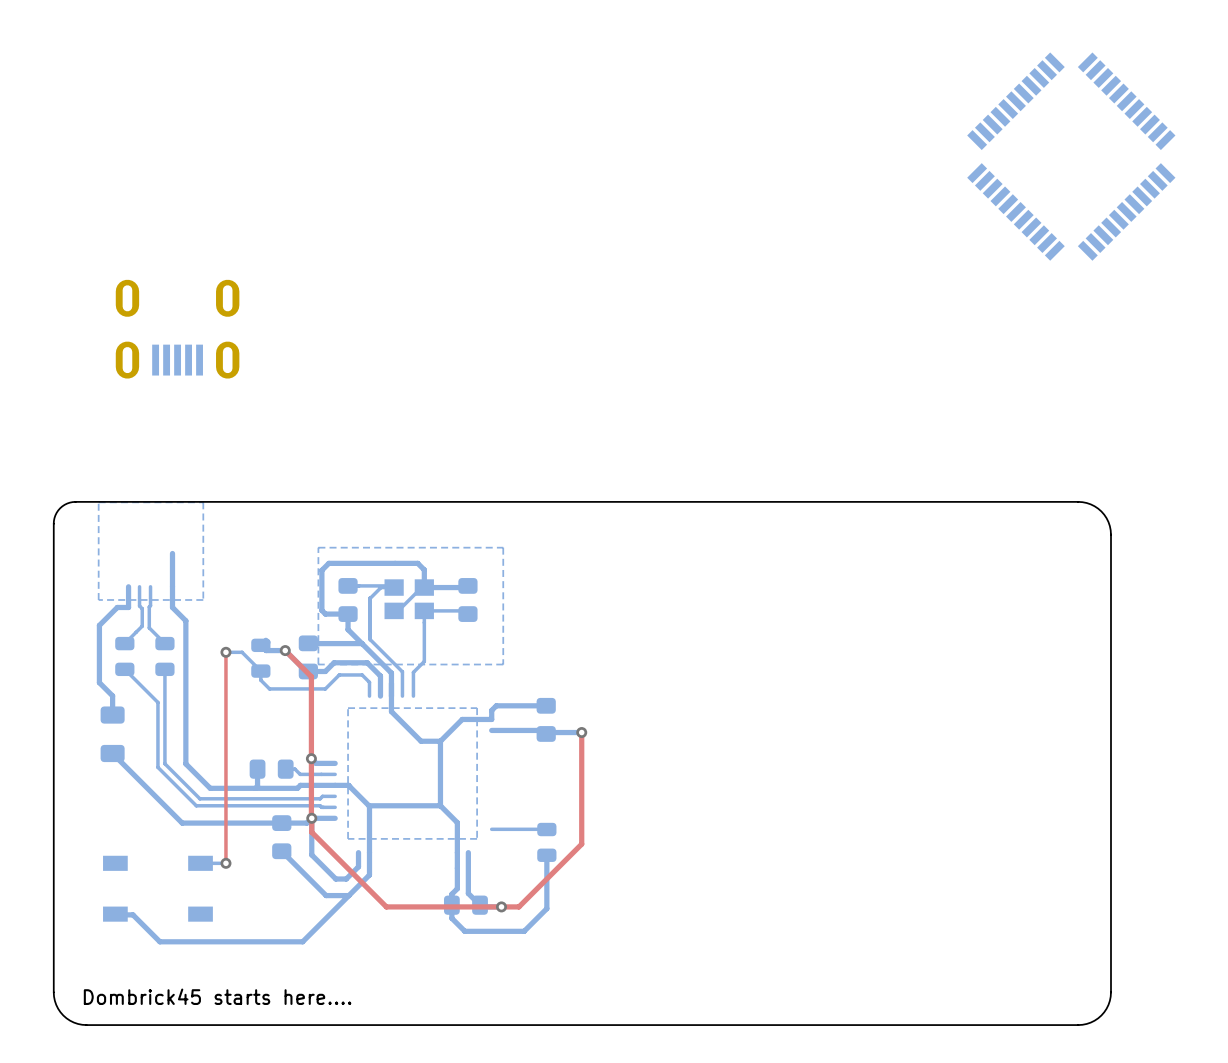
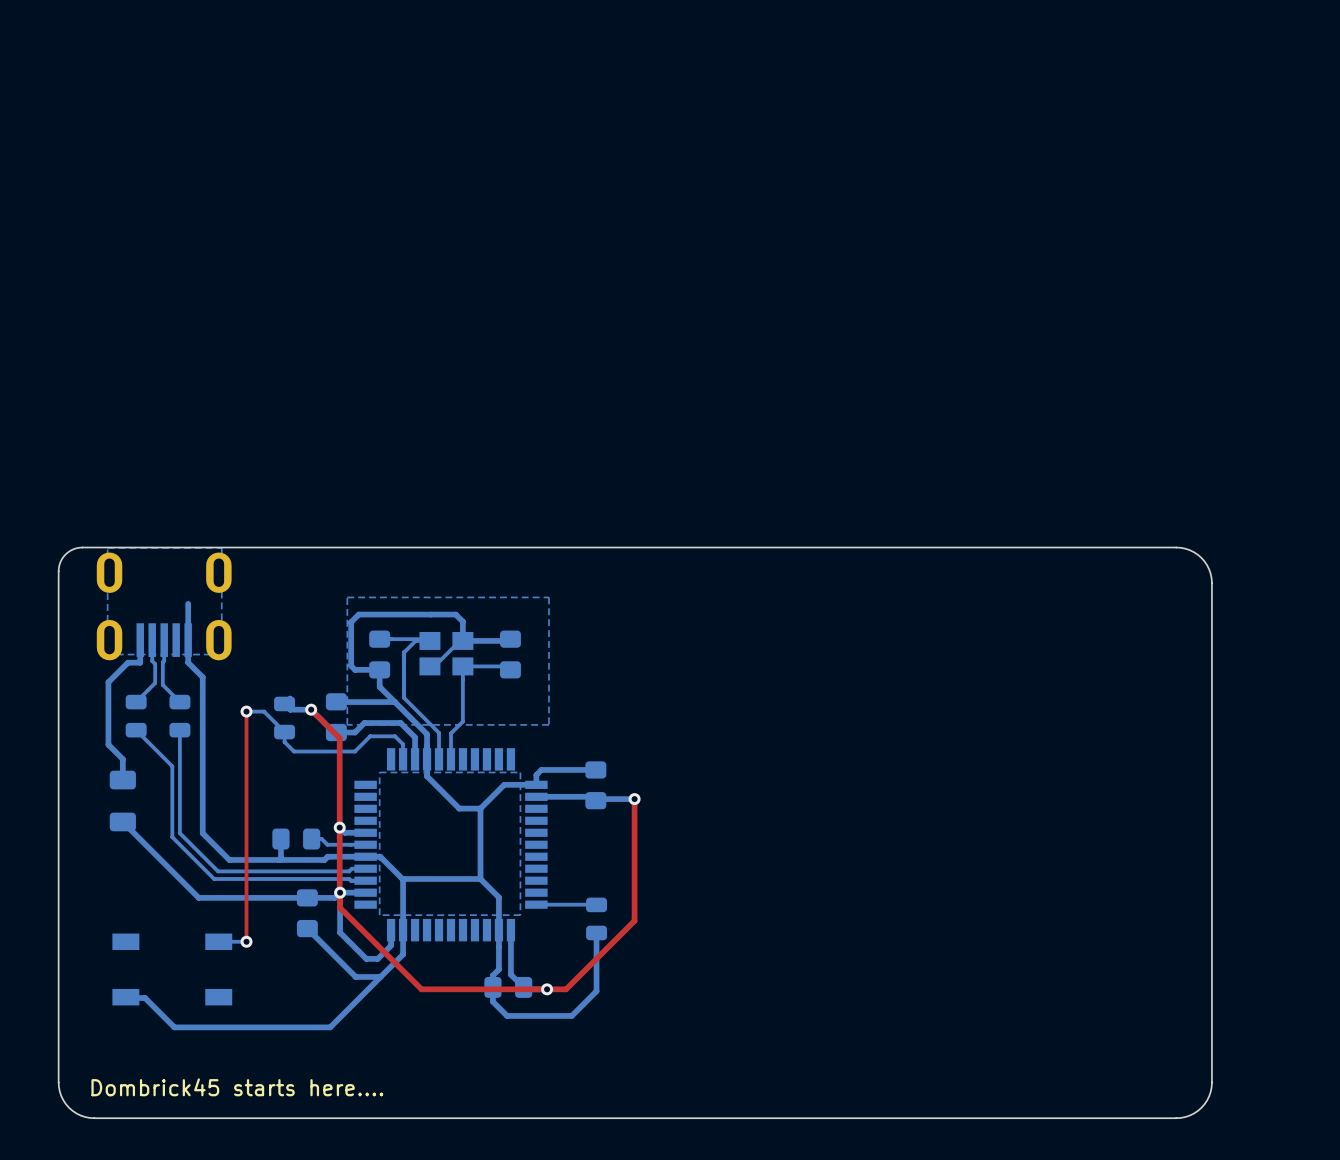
part: (1071, 156) -> none
part position: (177, 329) -> (164, 606)
part: none -> (451, 844)

